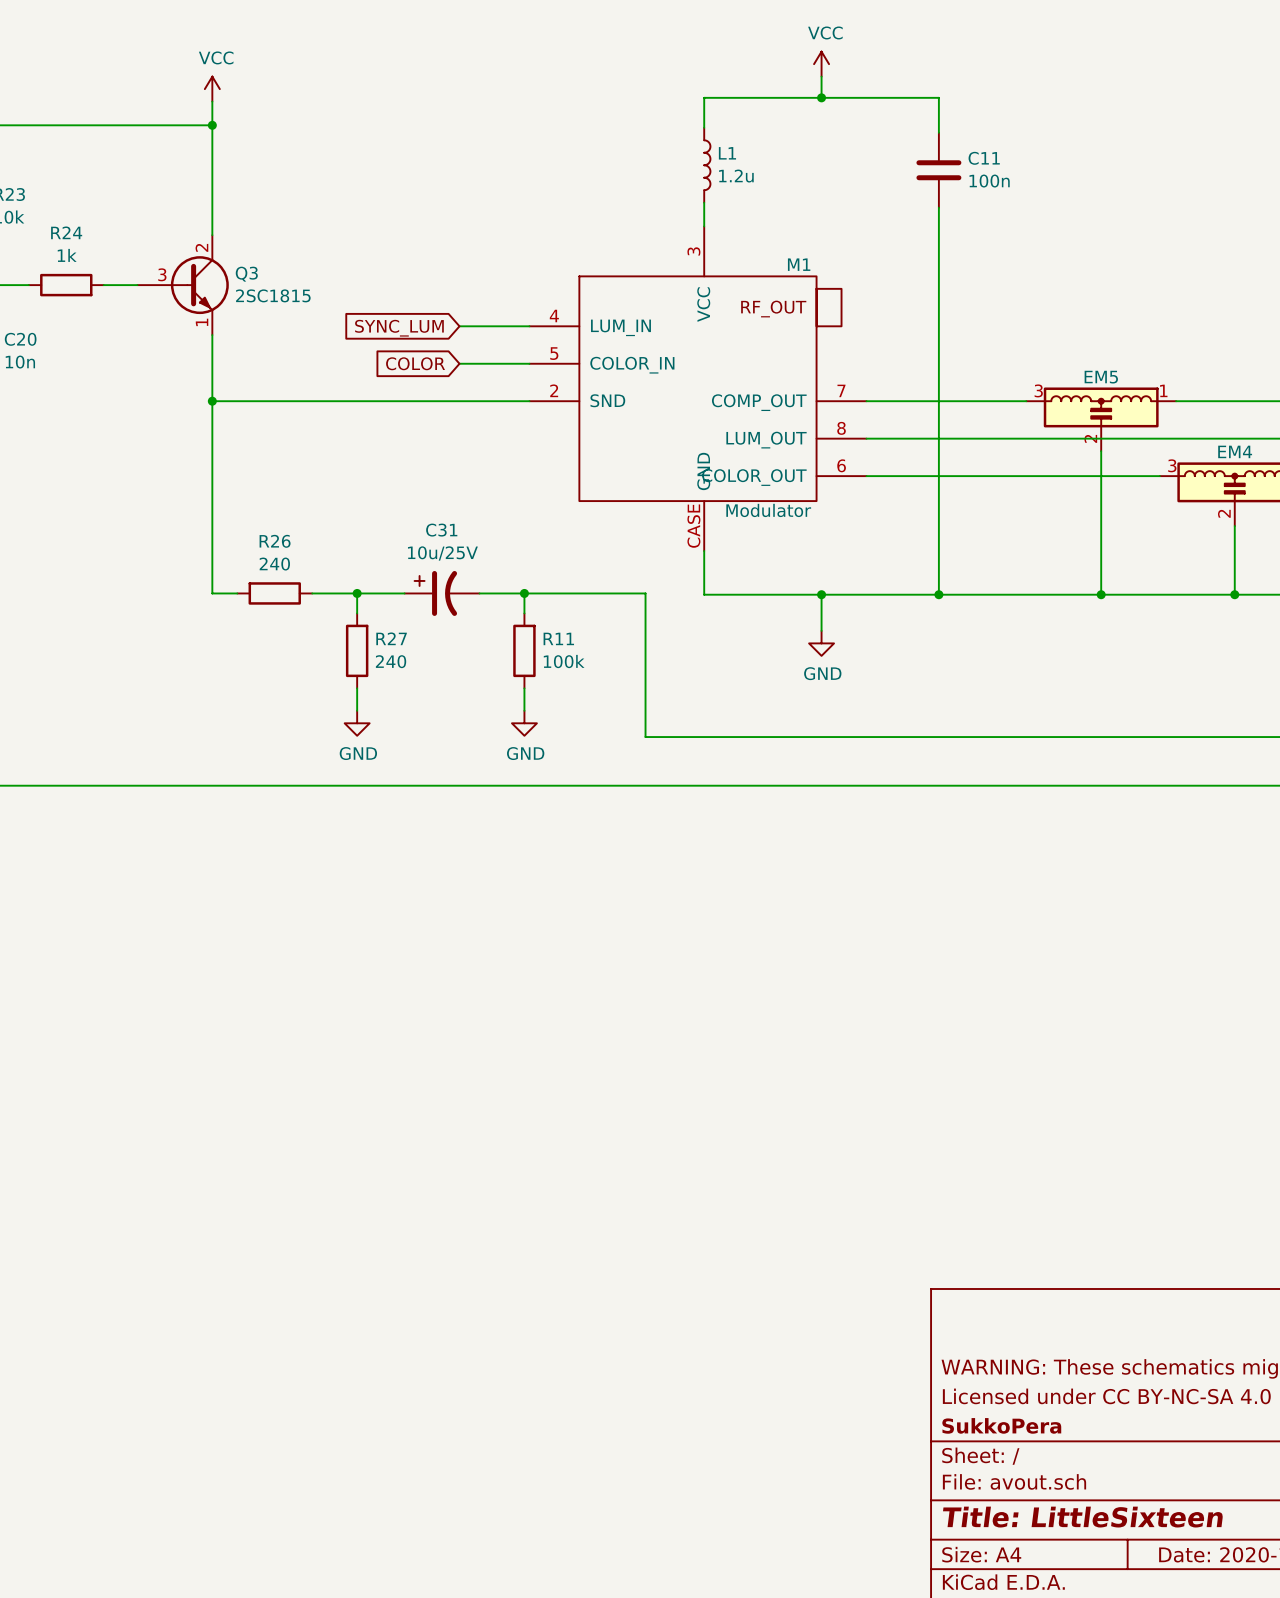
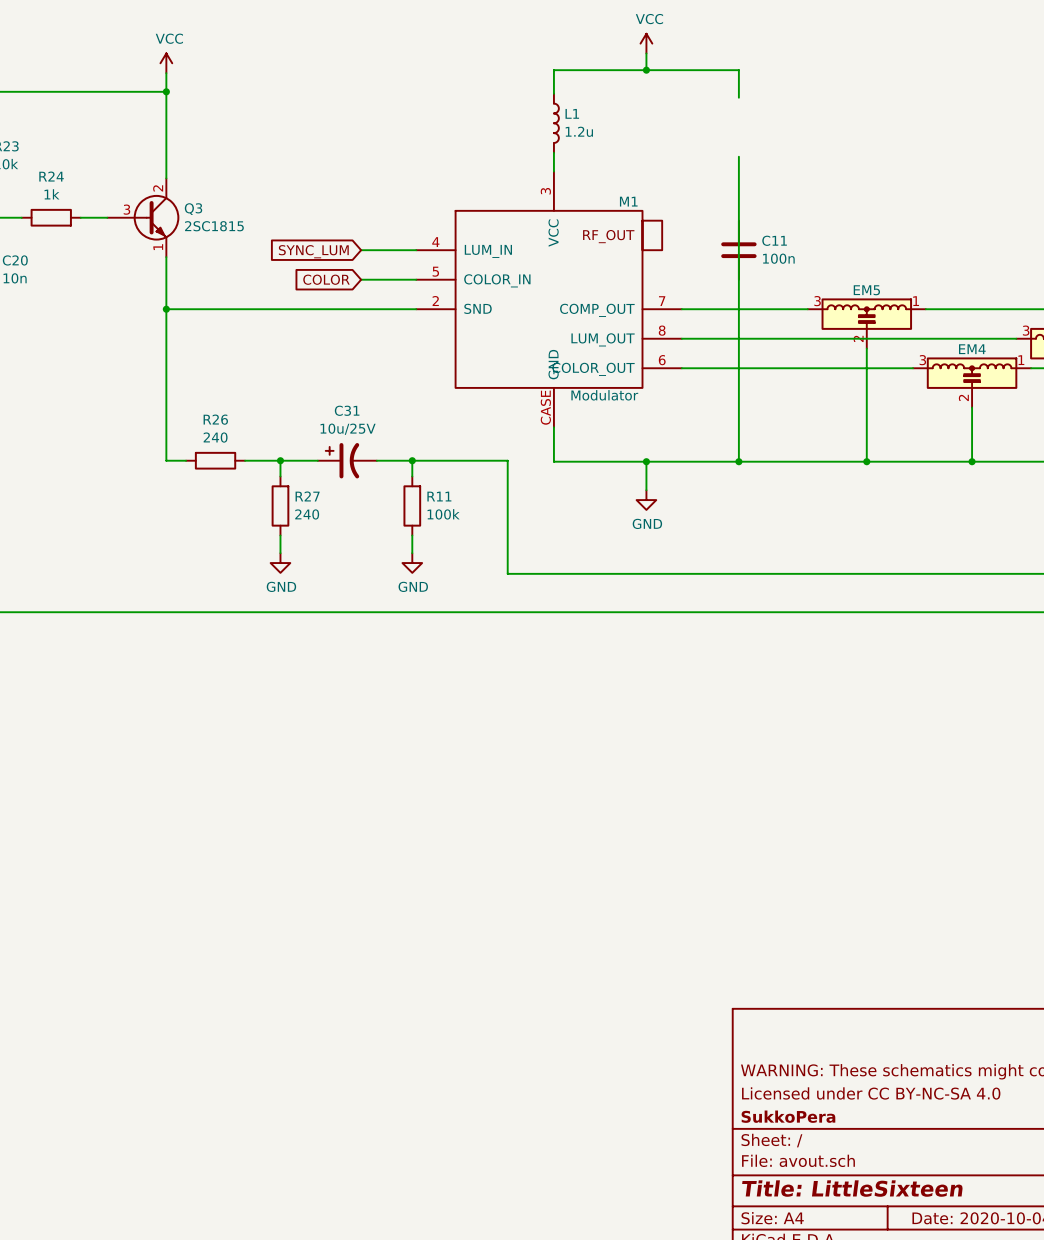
C11 position: (938, 170) -> (738, 250)

